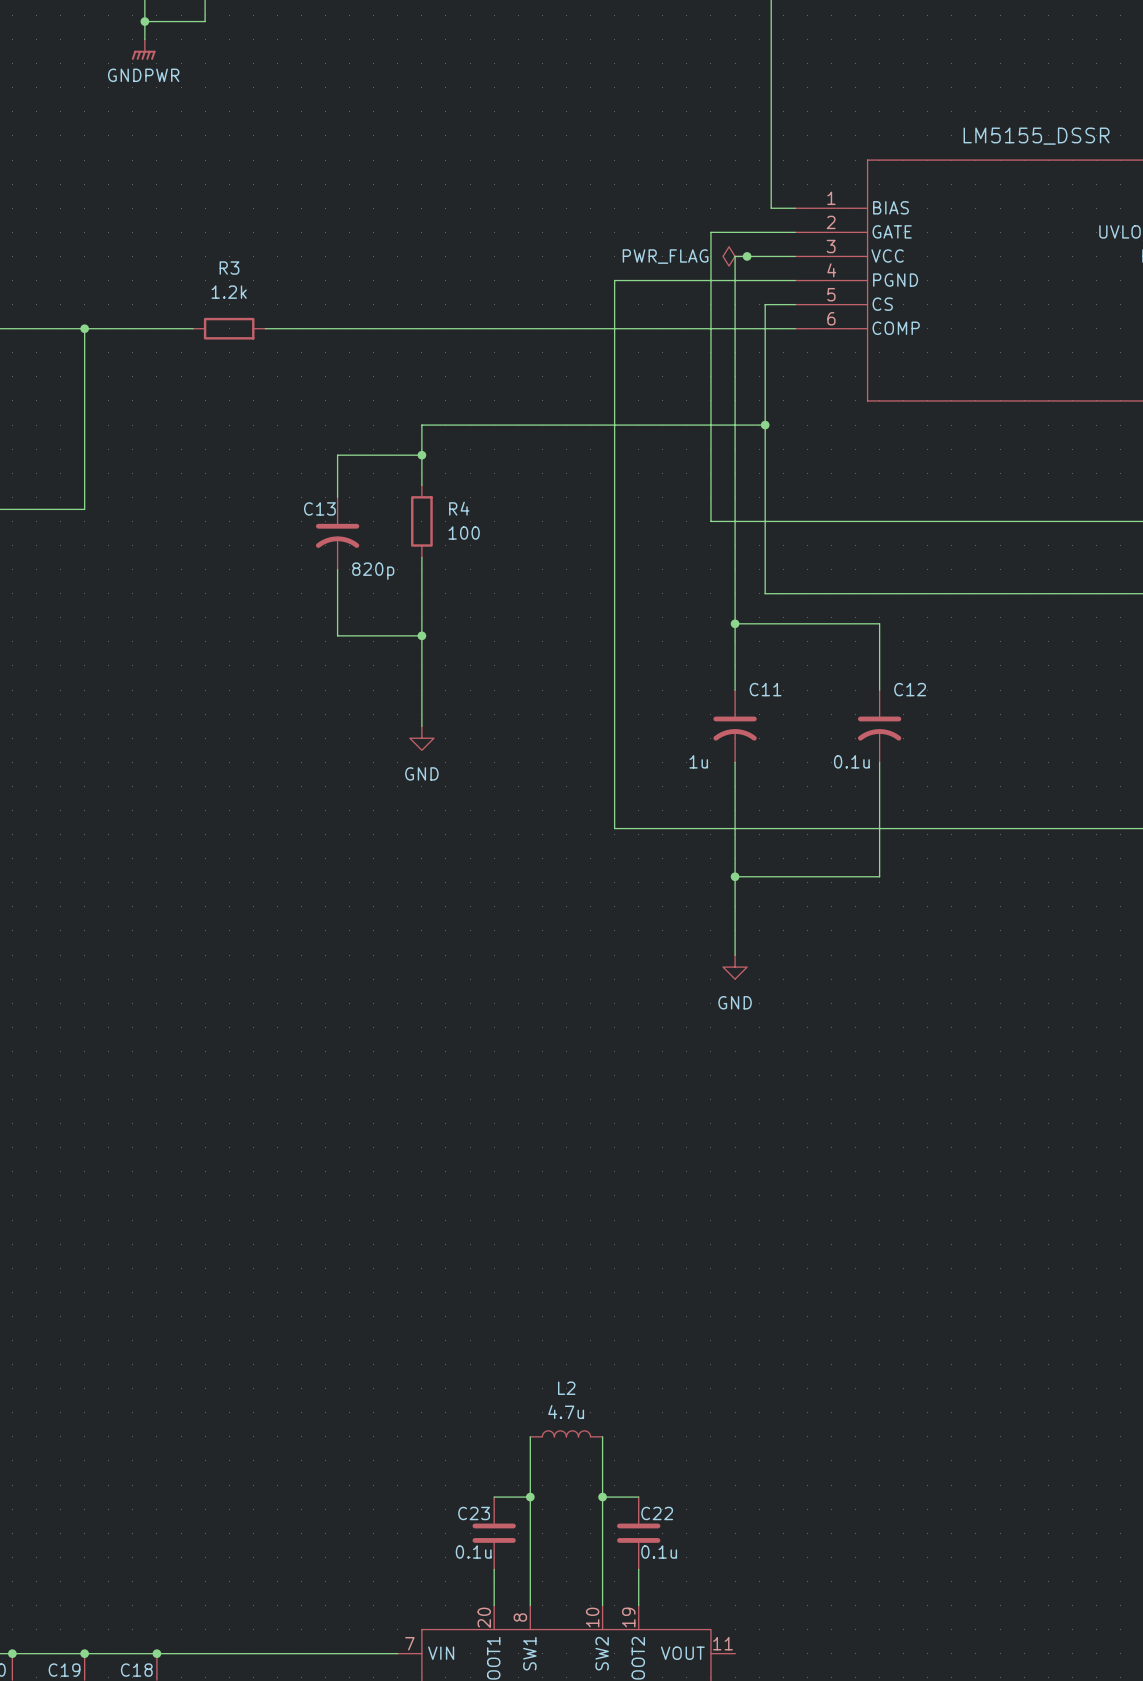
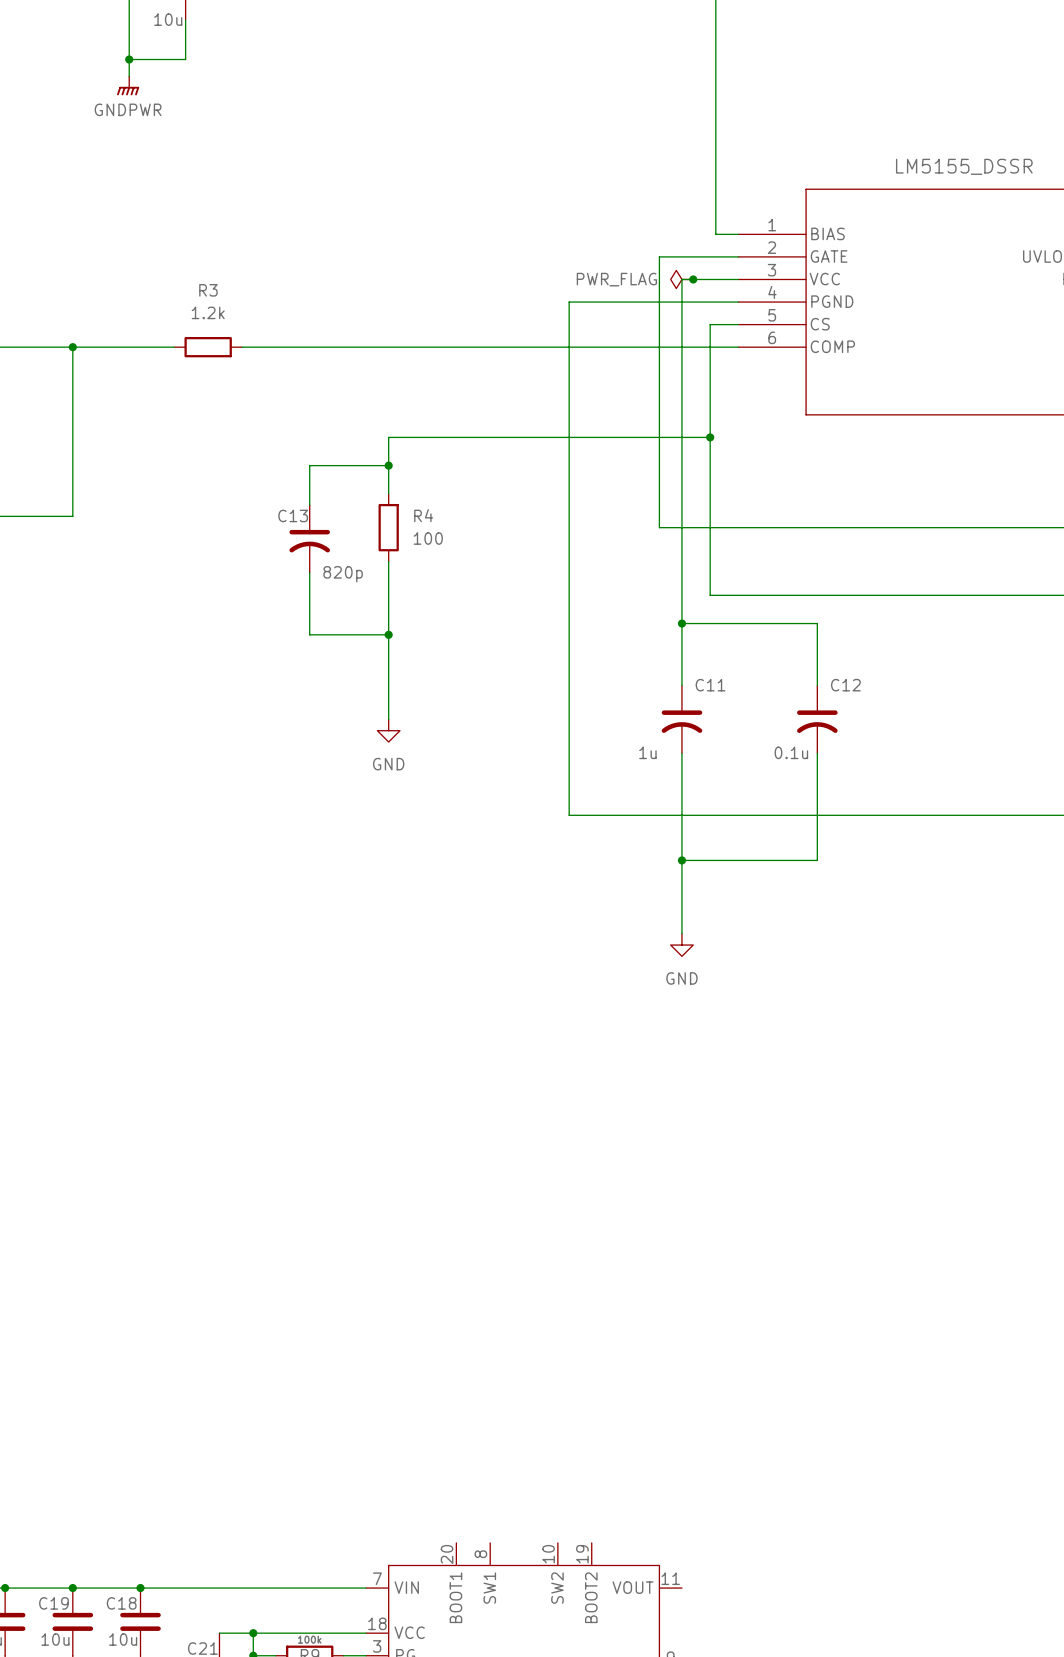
L2: 4.7u (566, 1433) -> none
wire: (530, 1436) (530, 1605) -> none
wire: (602, 1436) (602, 1605) -> none
wire: (494, 1497) (530, 1497) -> none
junction: (530, 1497) -> none
wire: (602, 1497) (638, 1497) -> none
junction: (602, 1497) -> none
C23: 0.1u (494, 1533) -> none
C22: 0.1u (638, 1533) -> none
wire: (494, 1569) (494, 1605) -> none
wire: (638, 1569) (638, 1605) -> none

